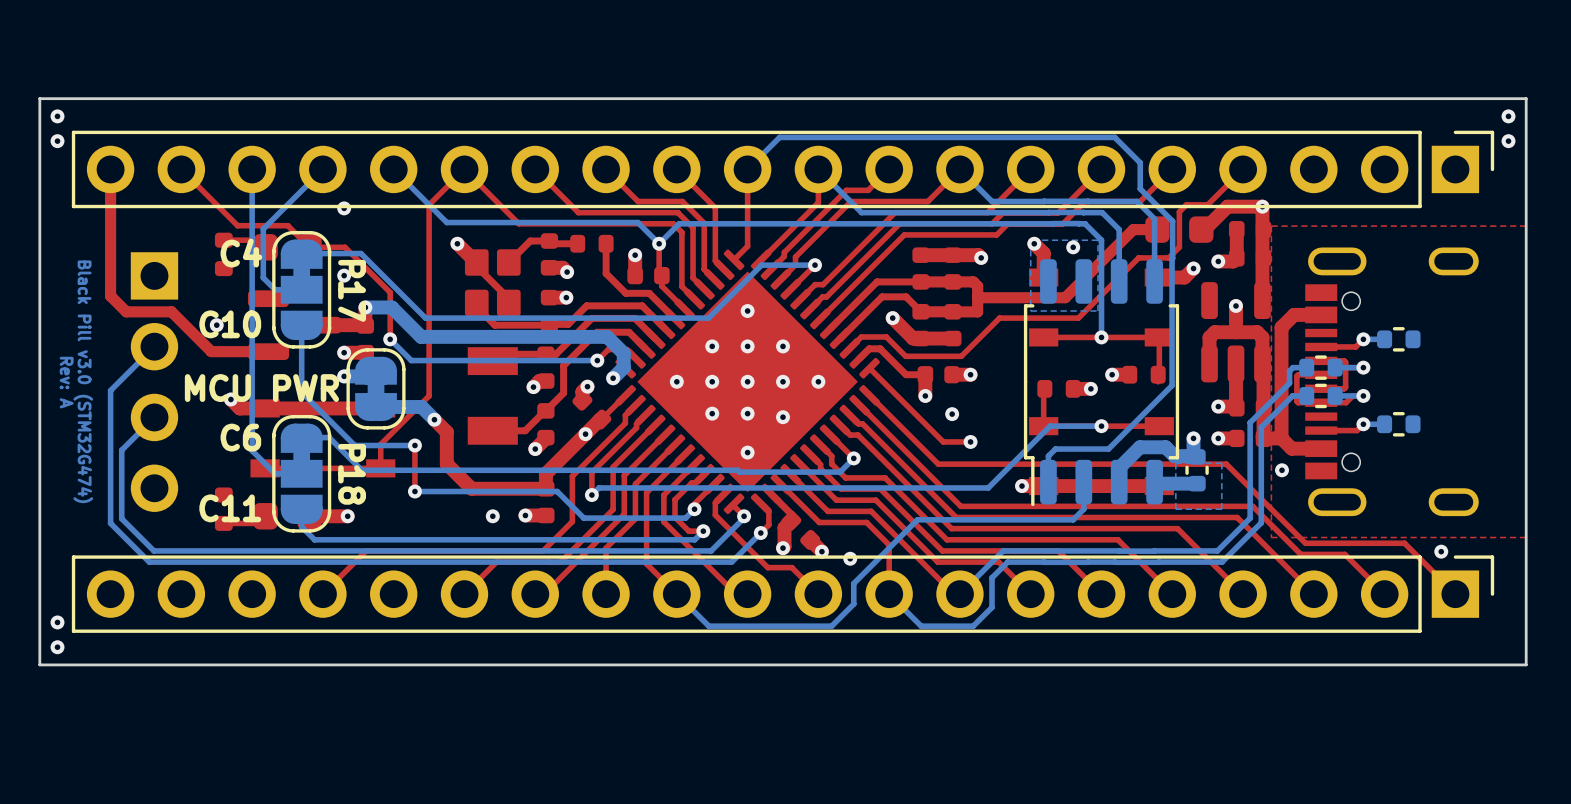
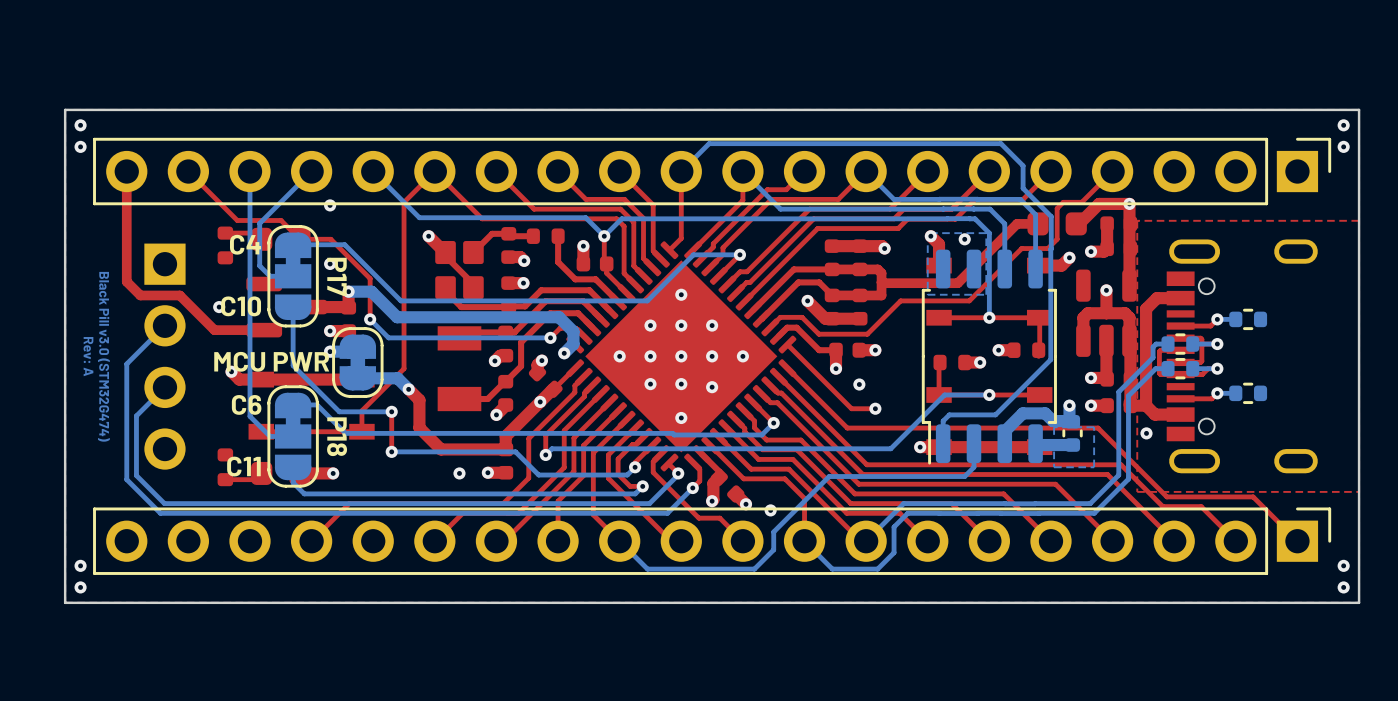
via: (1441, 551) -> none
via: none -> (1343, 565)
via: none -> (1343, 587)

